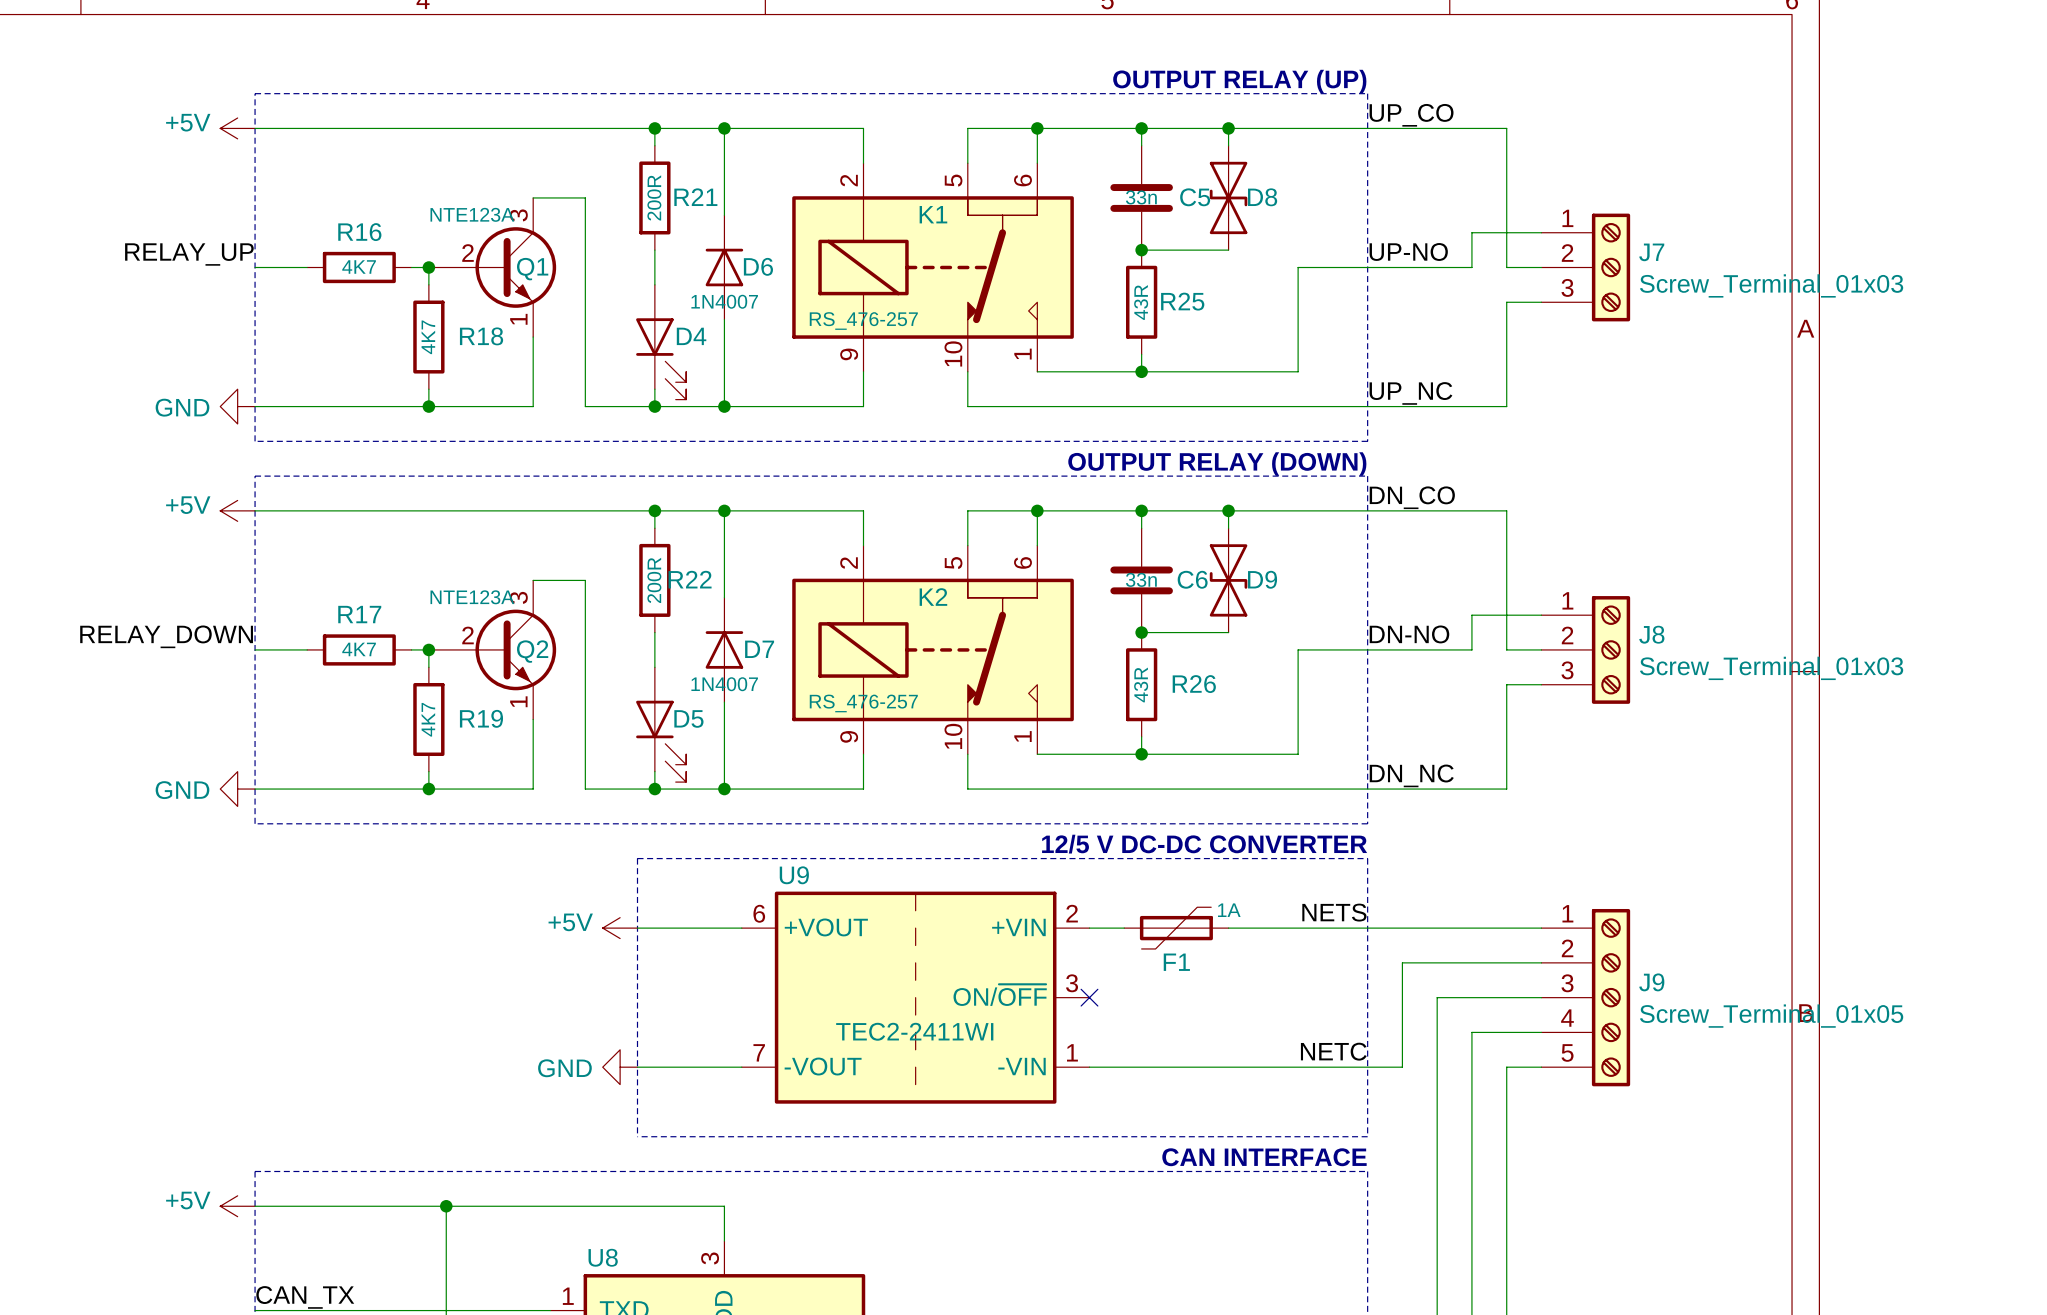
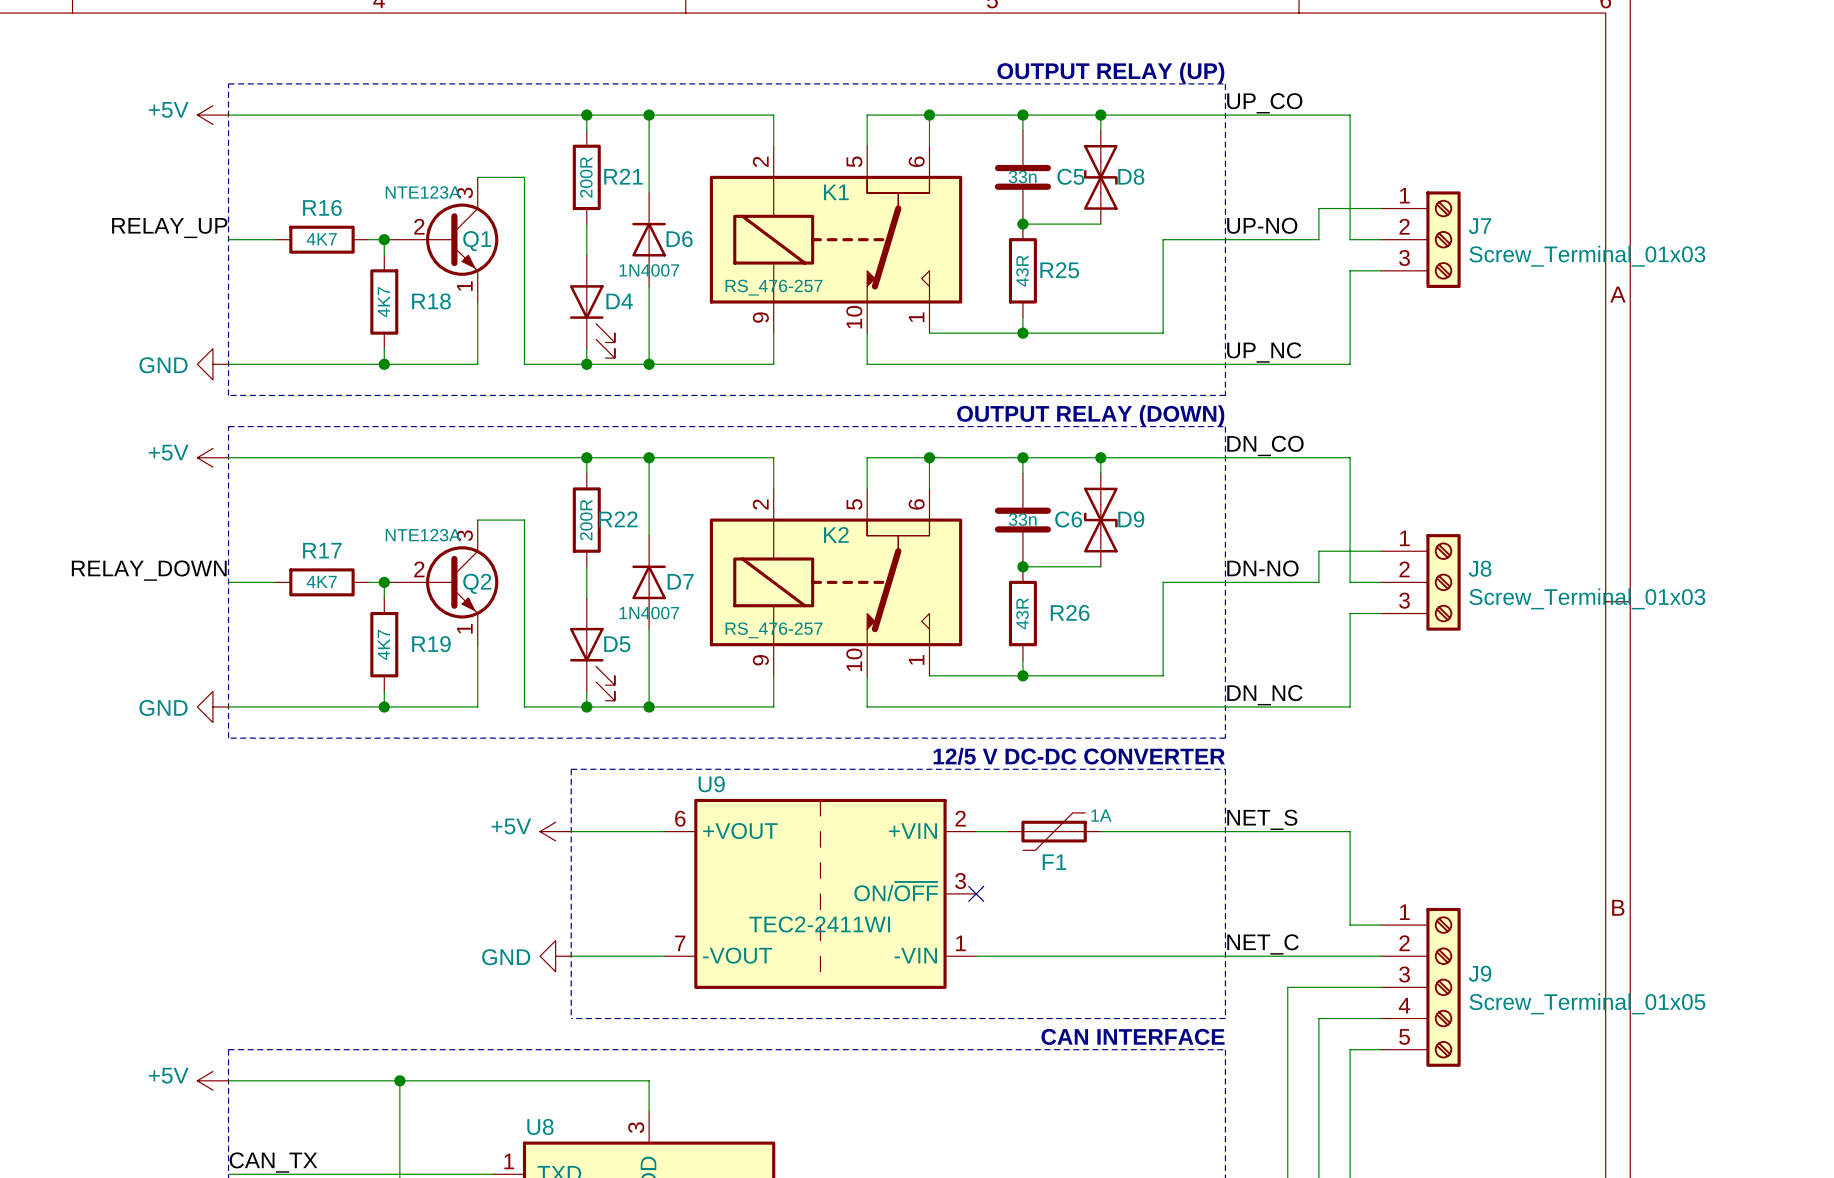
label: NETS (1334, 912) -> NET_S (1262, 819)
wire: (1506, 928) (1541, 928) -> (1350, 831) (1350, 925)
wire: (1541, 962) (1402, 962) (1402, 1067) -> (1350, 956) (1256, 956)
wire: (1541, 997) (1437, 997) (1437, 1101) -> (1381, 987) (1287, 987)
J9 position: (1585, 997) -> (1420, 987)
wire: (1506, 1032) (1471, 1032) (1471, 1136) -> (1381, 1018) (1318, 1018)
label: NETC (1333, 1051) -> NET_C (1263, 944)
wire: (1506, 1067) (1506, 1171) -> (1381, 1049) (1350, 1049)

